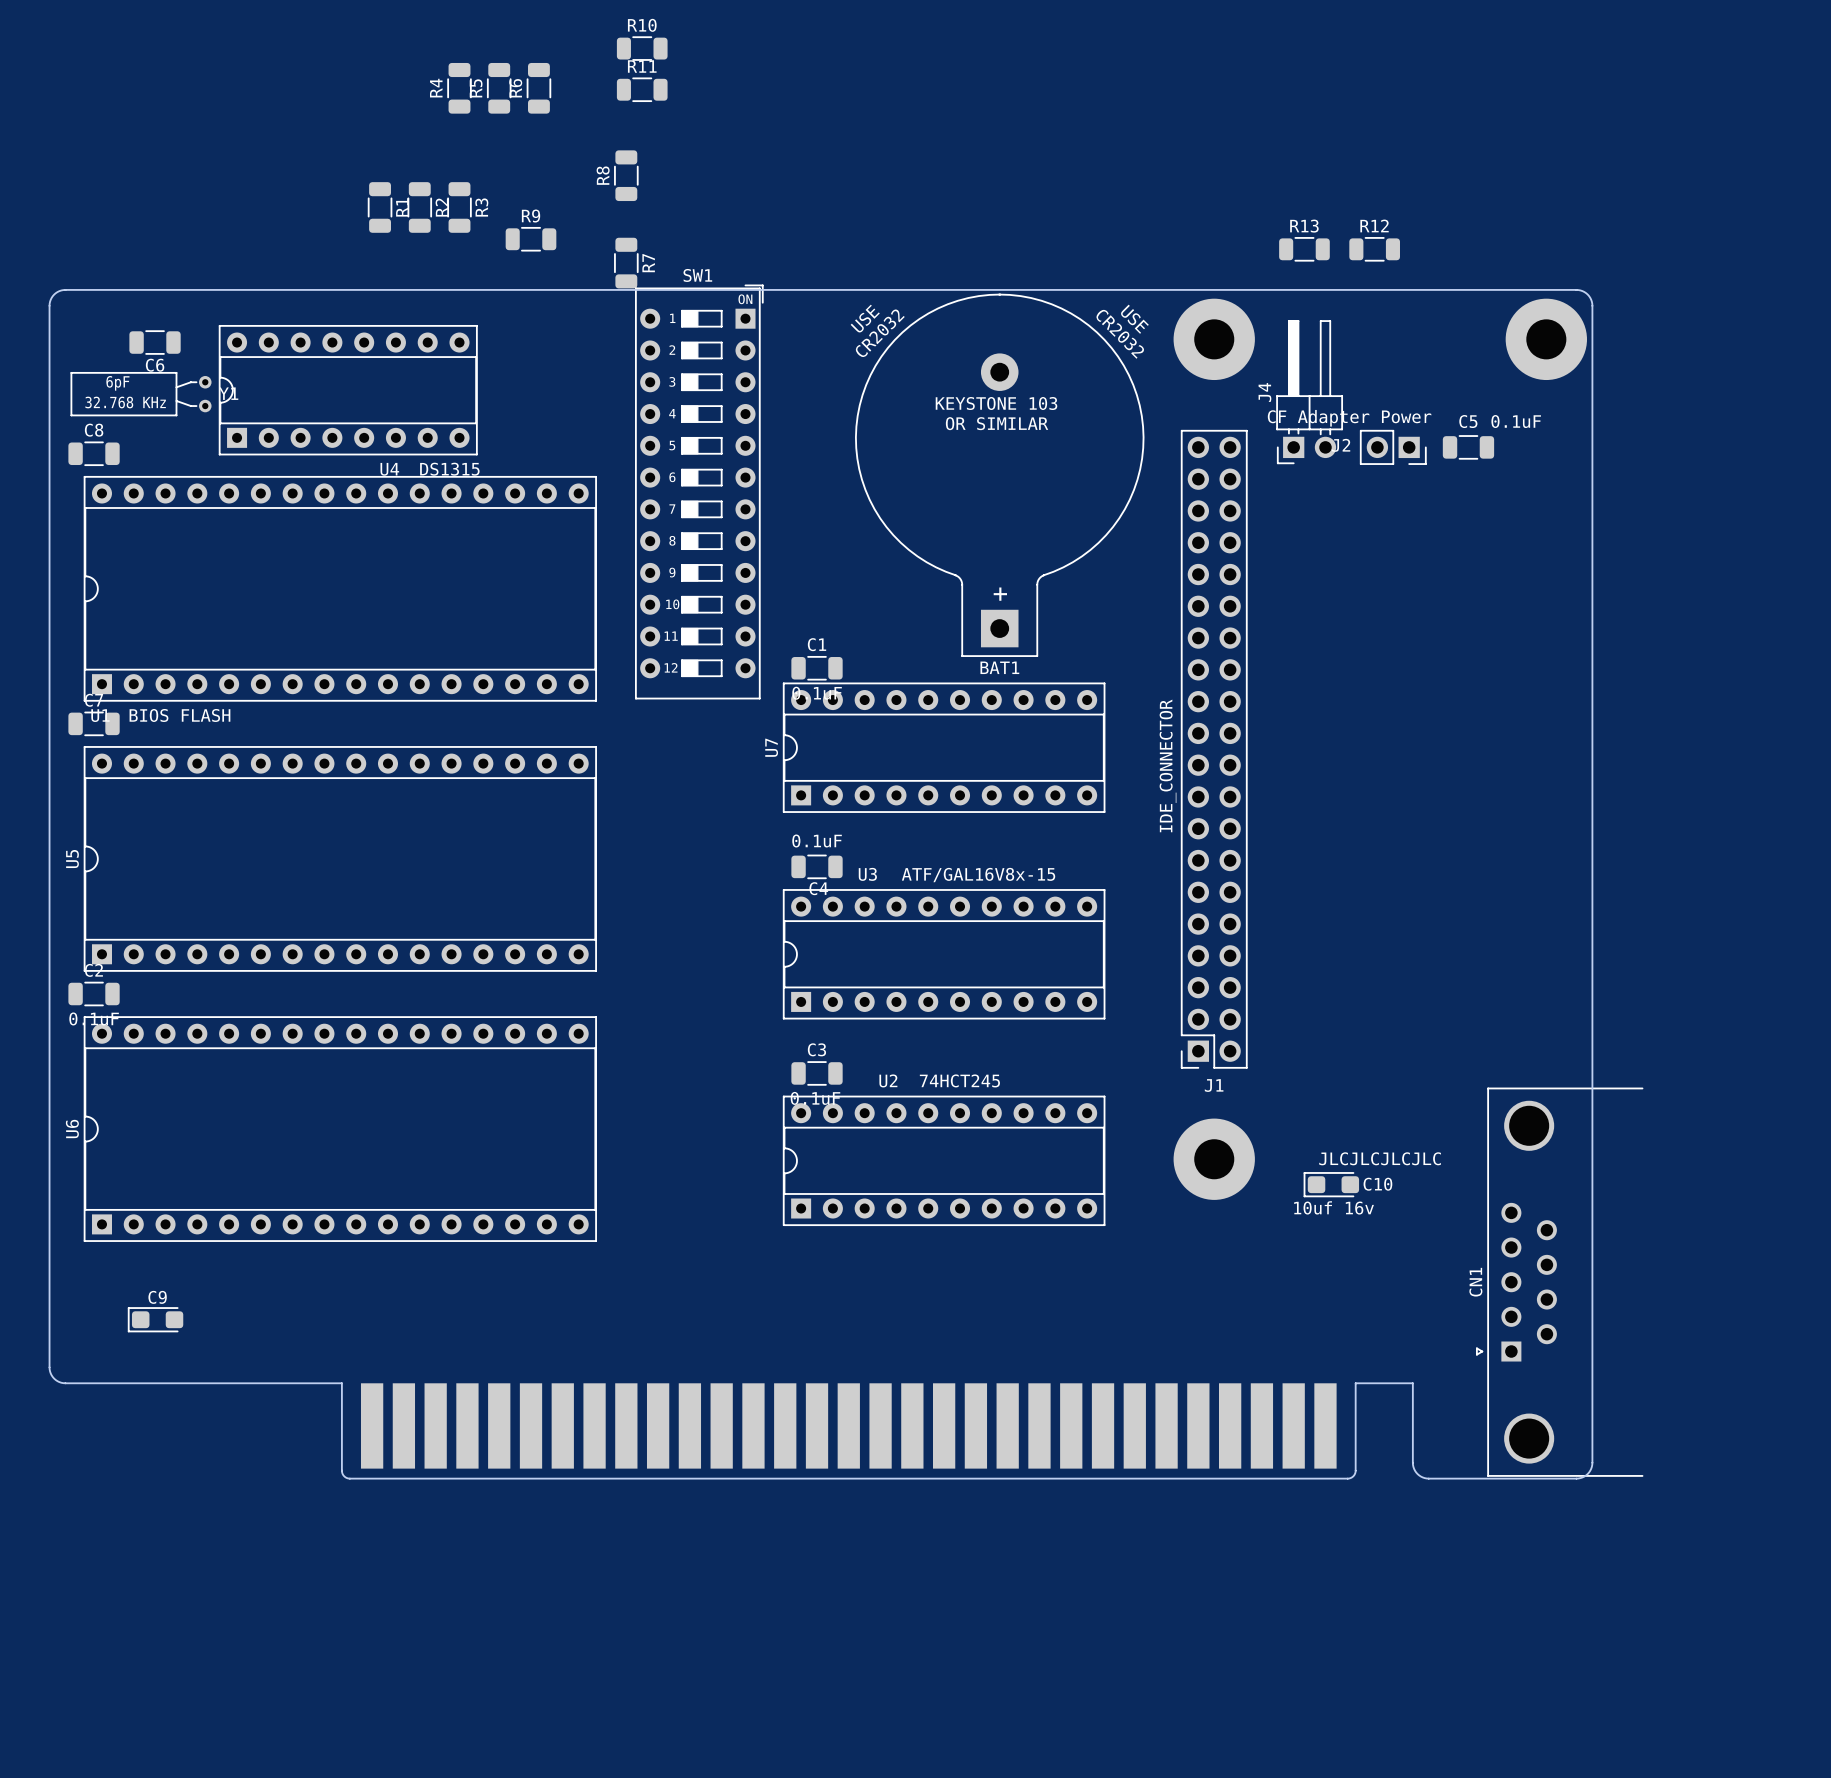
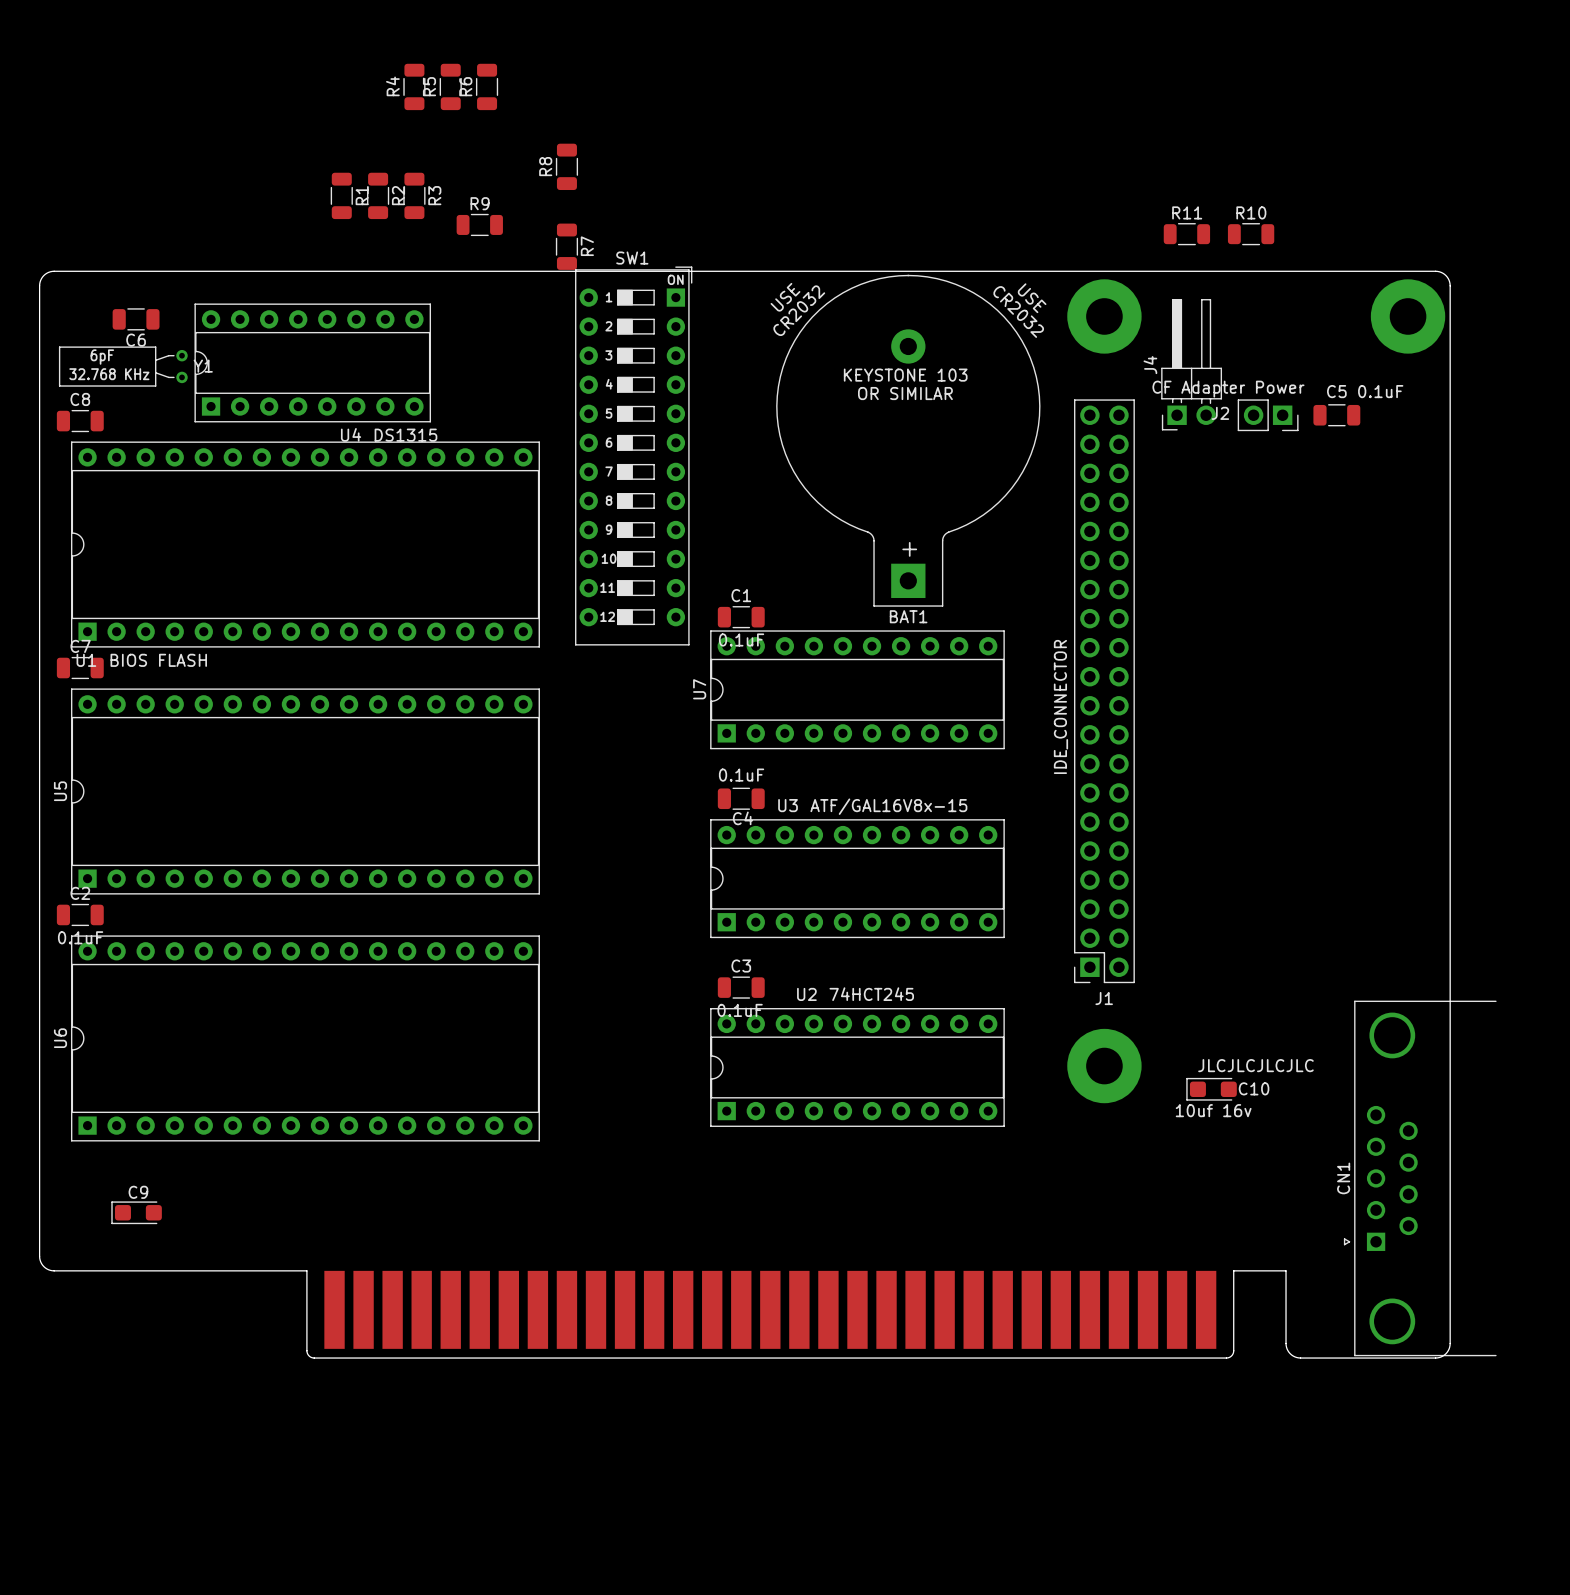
R10: (642, 48) -> none
R11: (642, 89) -> none
R12 name: R12 (1374, 225) -> R10 (1251, 212)
R13 name: R13 (1304, 226) -> R11 (1187, 212)

